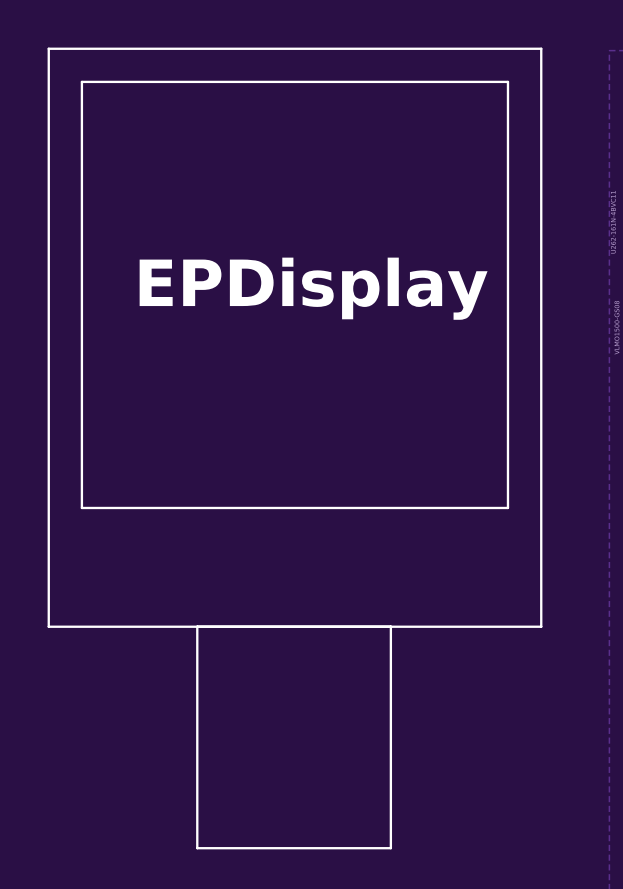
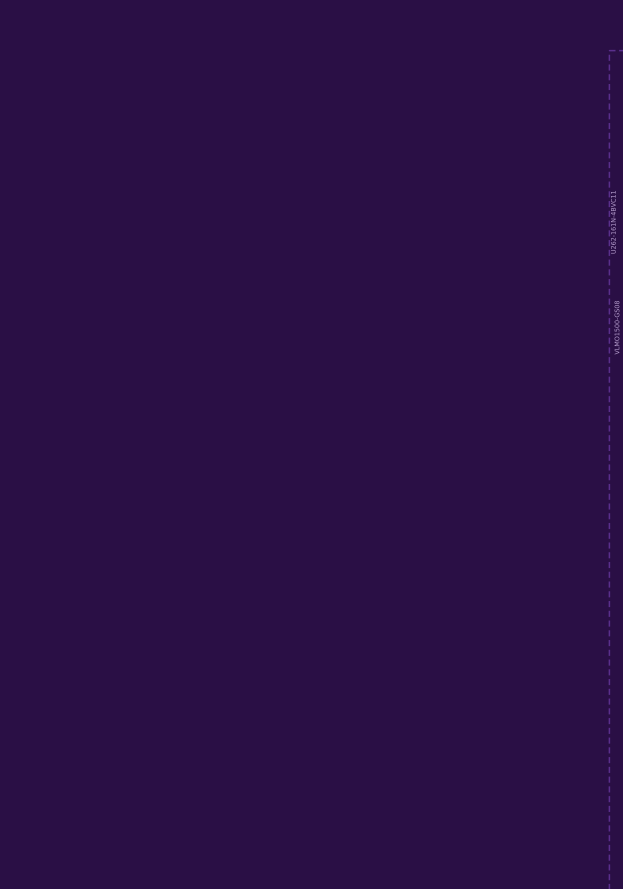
line: (48, 48) (541, 48) (541, 626) (48, 626) (48, 48) -> none
line: (81, 81) (507, 81) (507, 507) (81, 507) (81, 81) -> none
text: EPDisplay (313, 288) -> none
line: (197, 626) (197, 848) (390, 848) (390, 626) -> none

